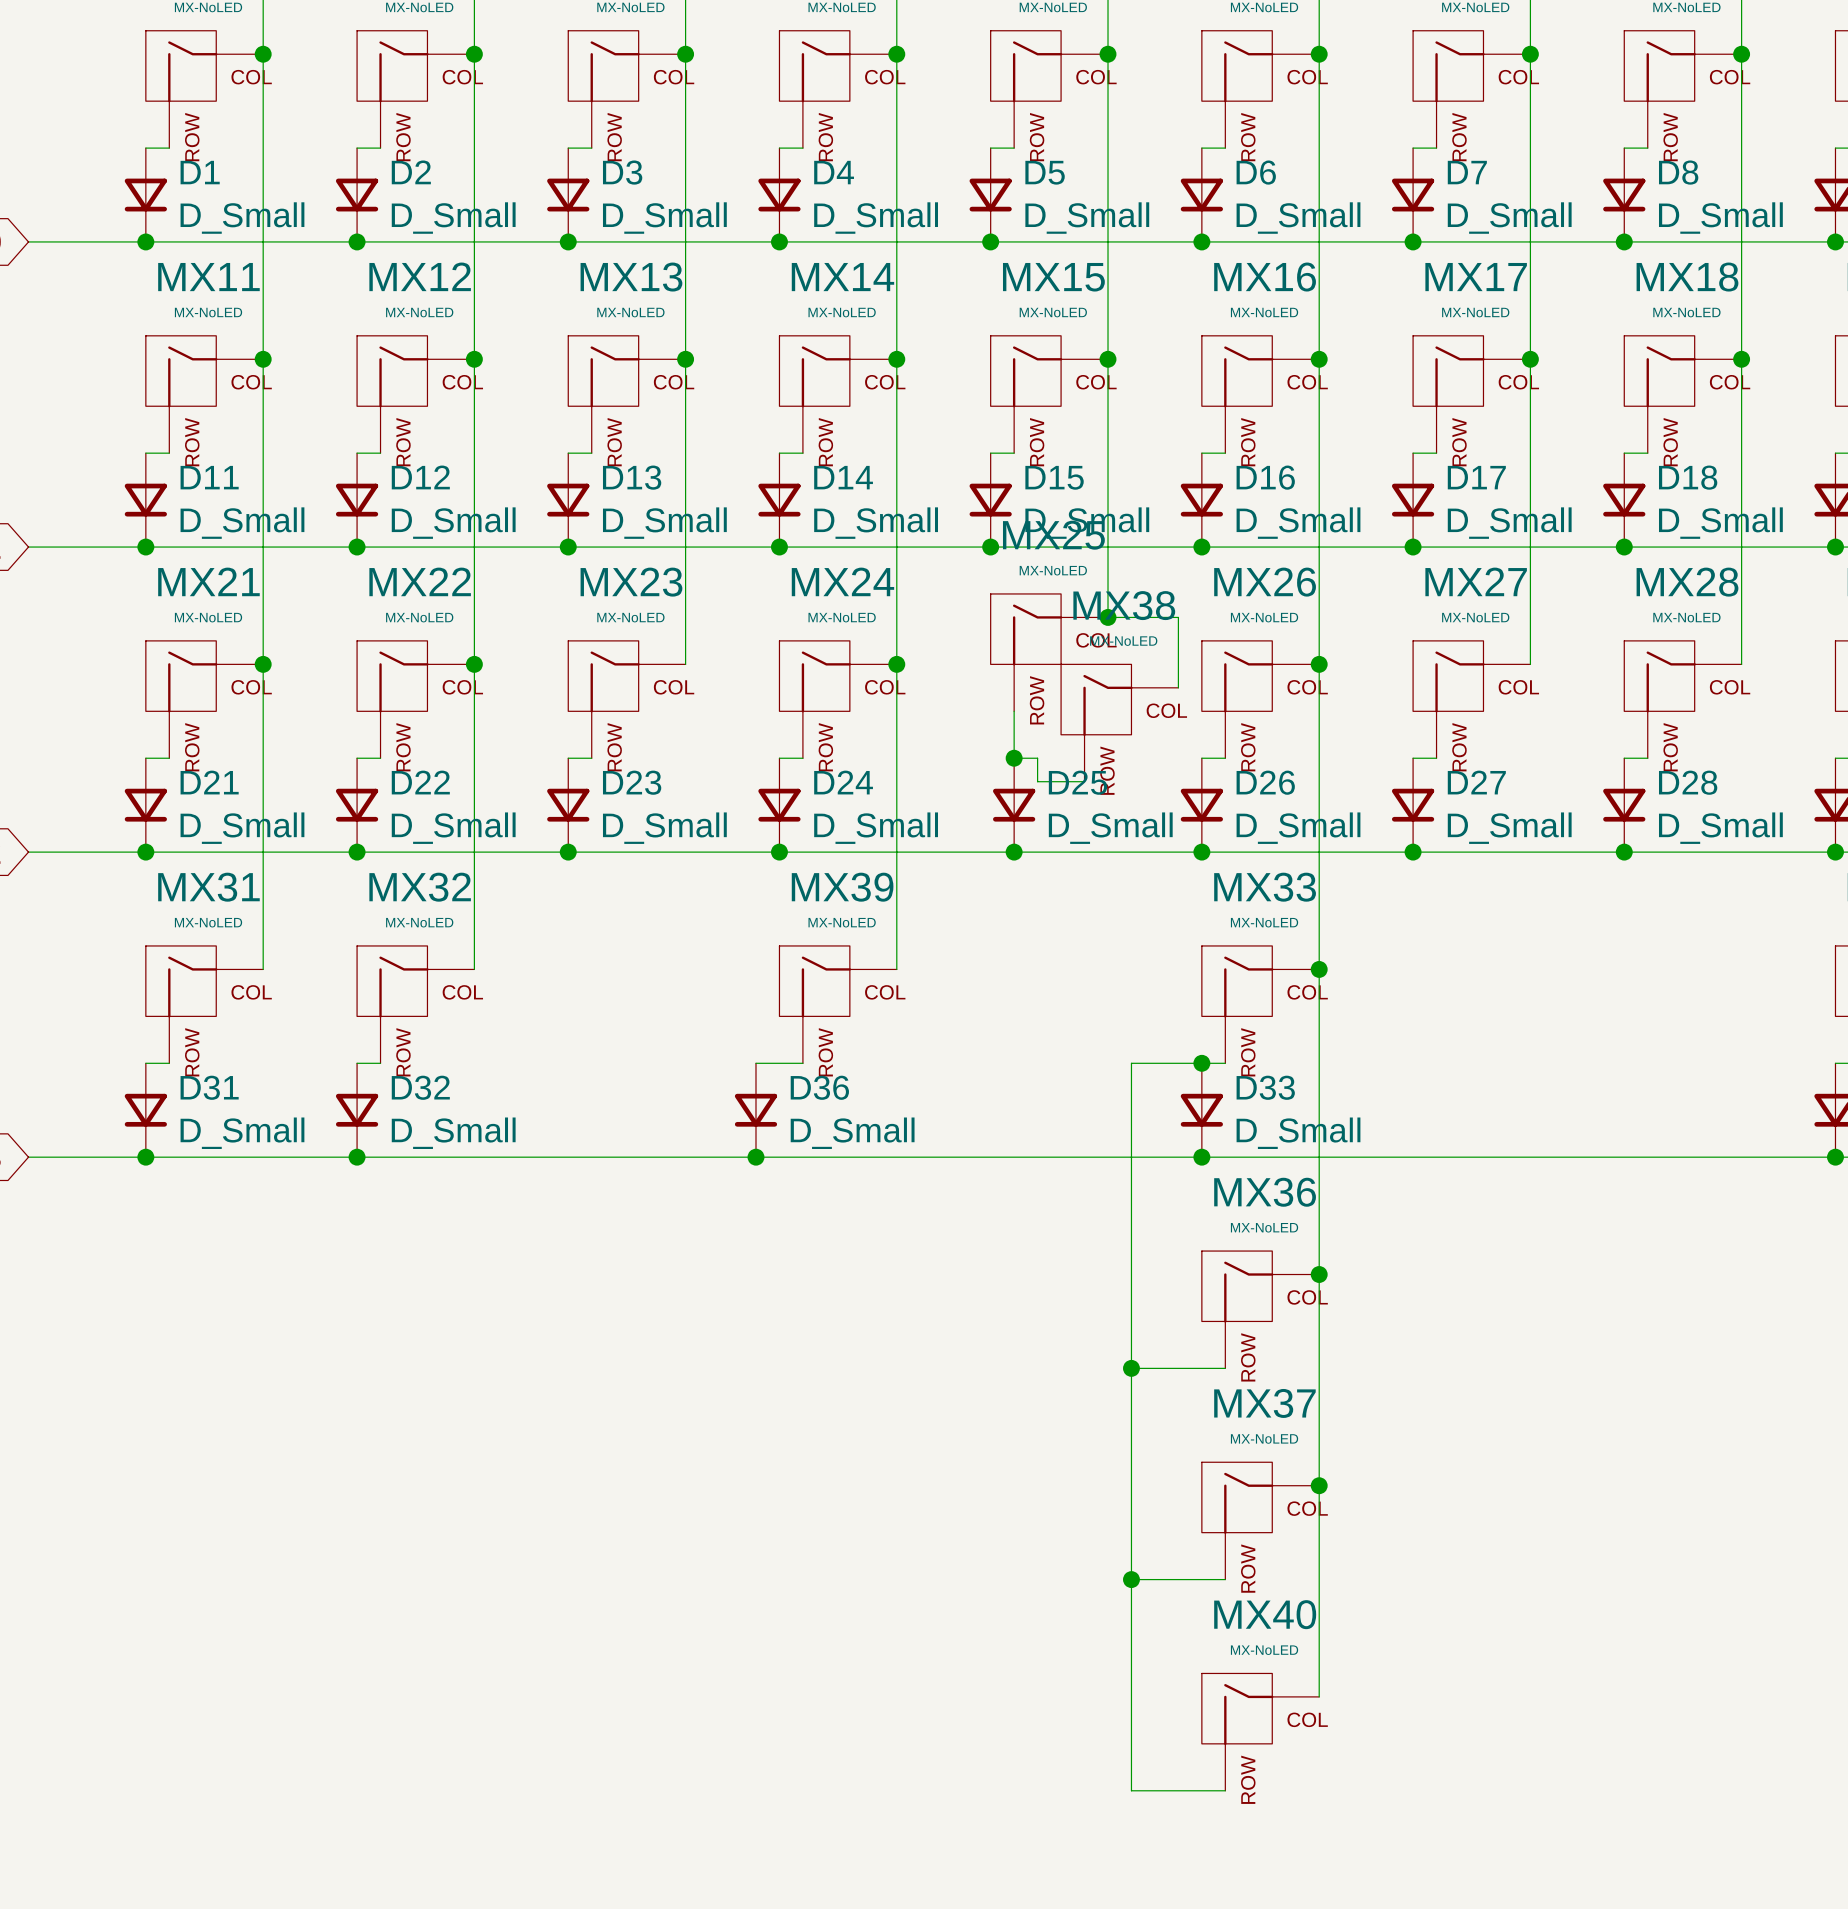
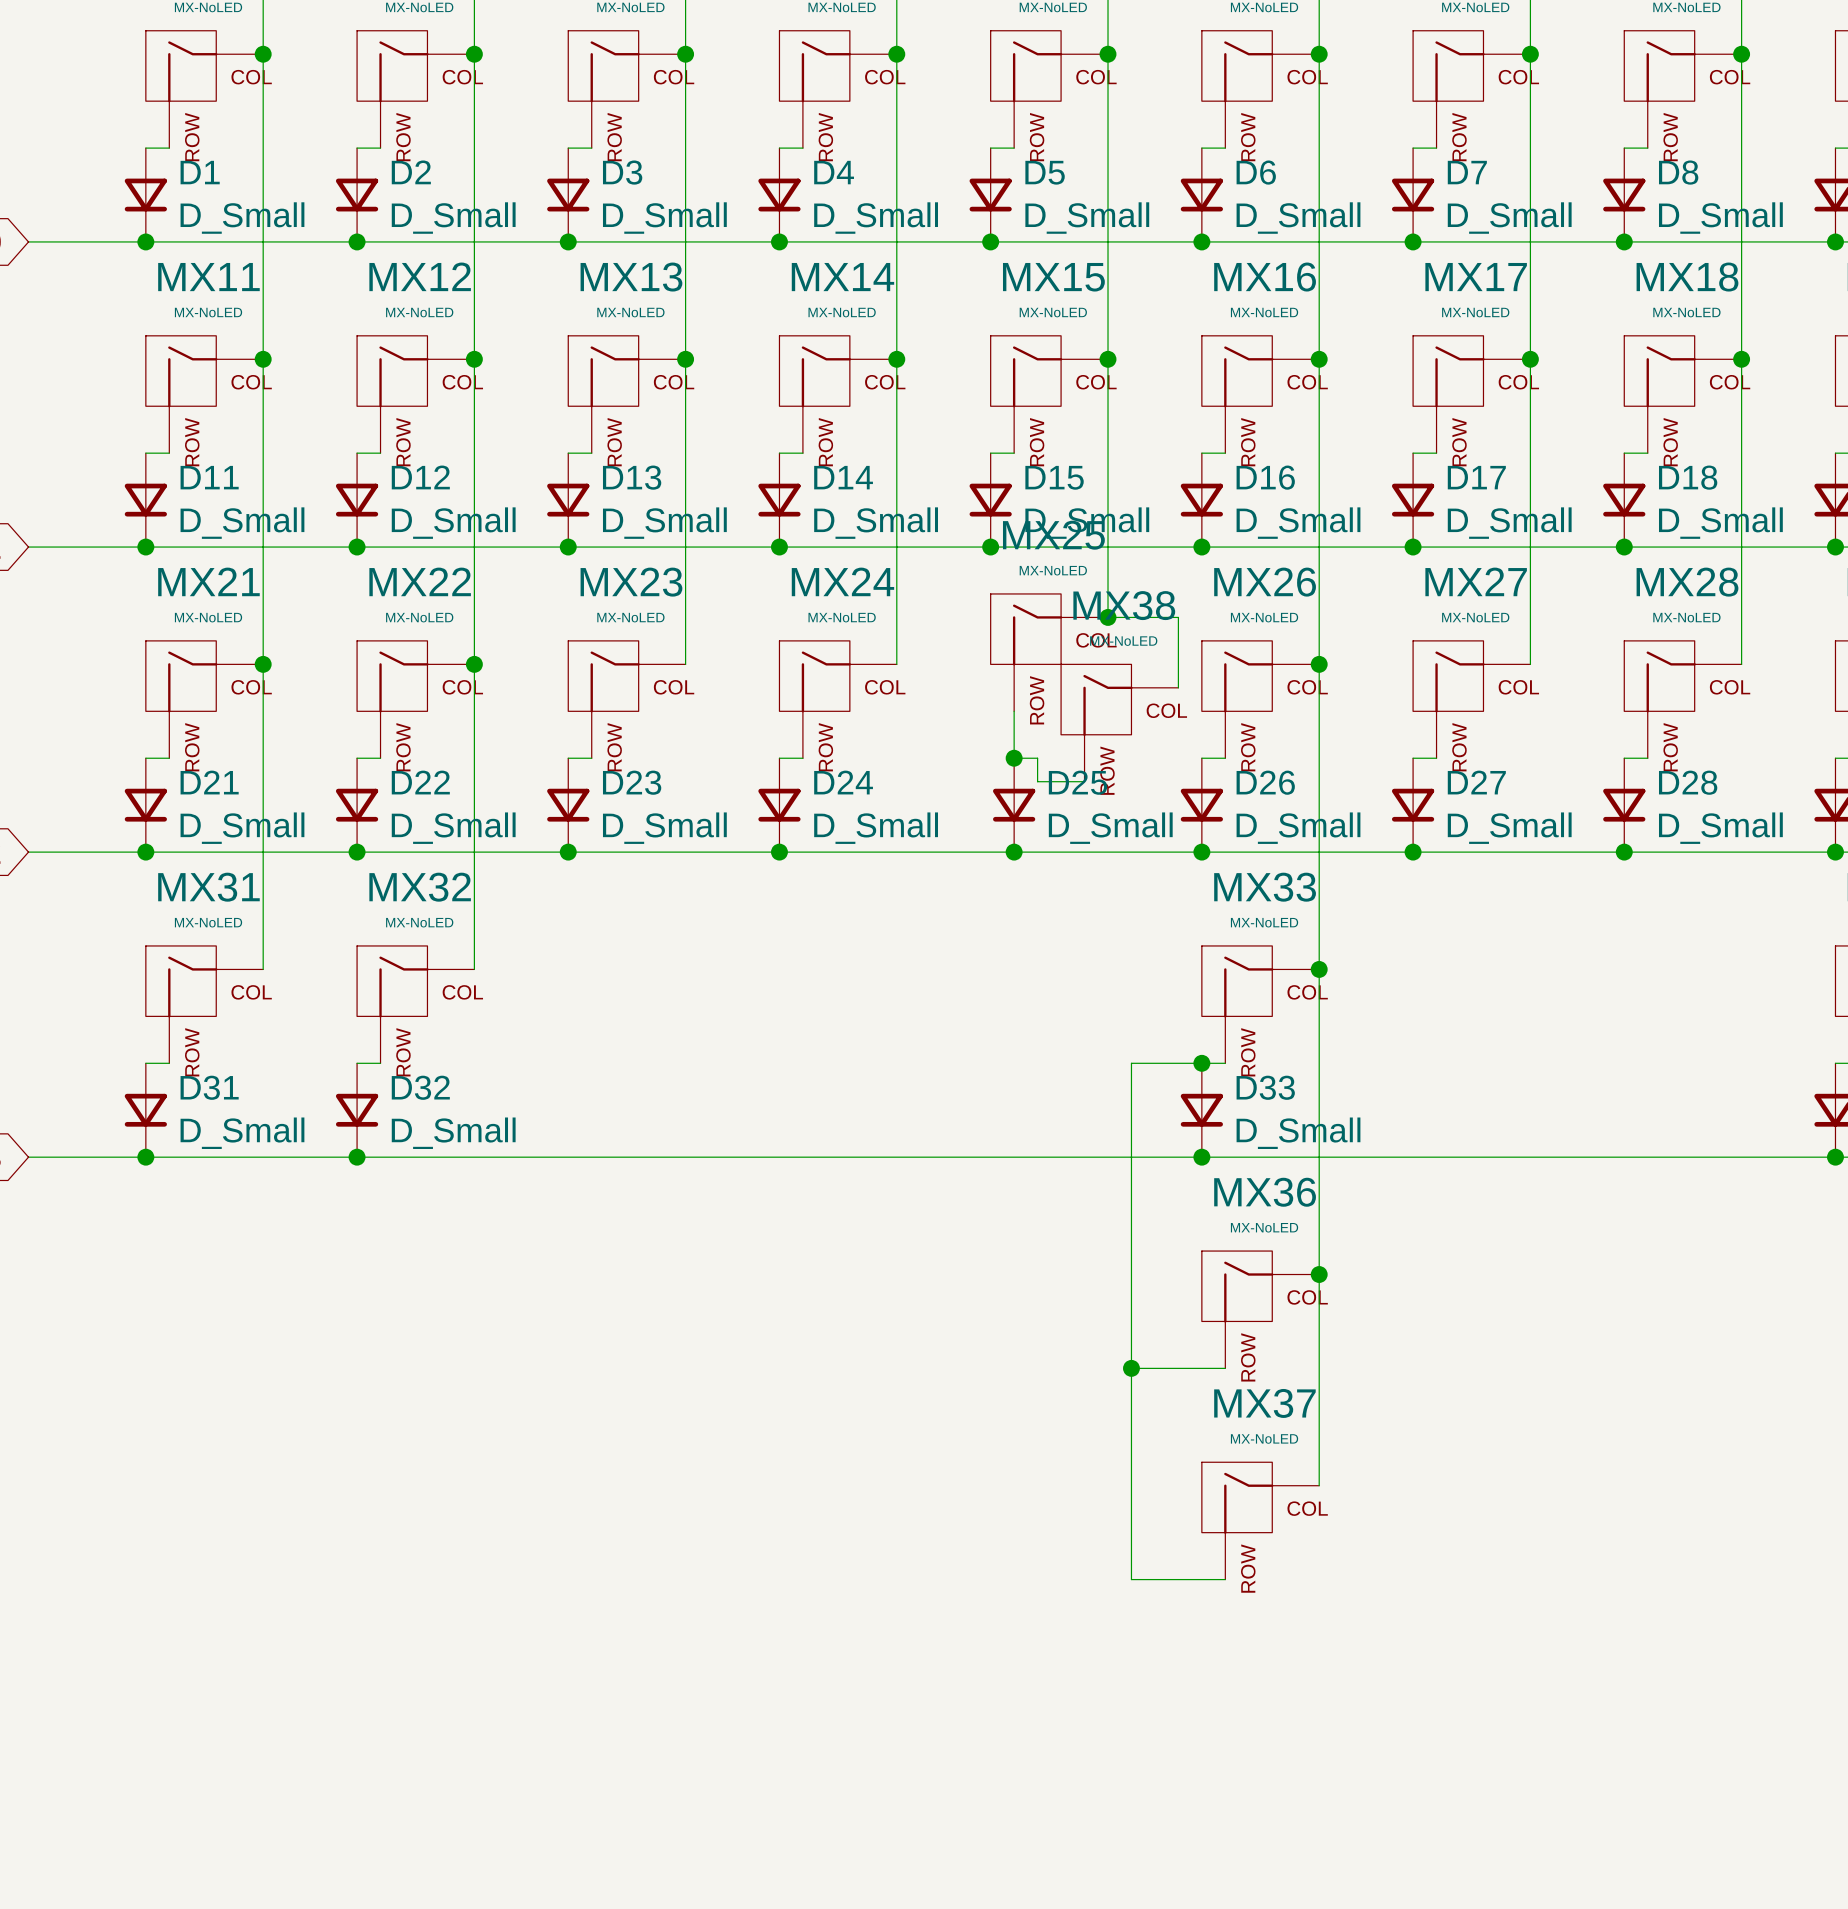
wire: (896, 664) (896, 969) -> none
junction: (896, 664) -> none
MX39: MX-NoLED (838, 1004) -> none
wire: (755, 1063) (802, 1063) -> none
D36: D_Small (755, 1110) -> none
junction: (755, 1157) -> none
wire: (1319, 1485) (1319, 1696) -> none
junction: (1319, 1485) -> none
wire: (1131, 1579) (1131, 1790) (1225, 1790) -> none
junction: (1131, 1579) -> none
MX40: MX-NoLED (1260, 1732) -> none

